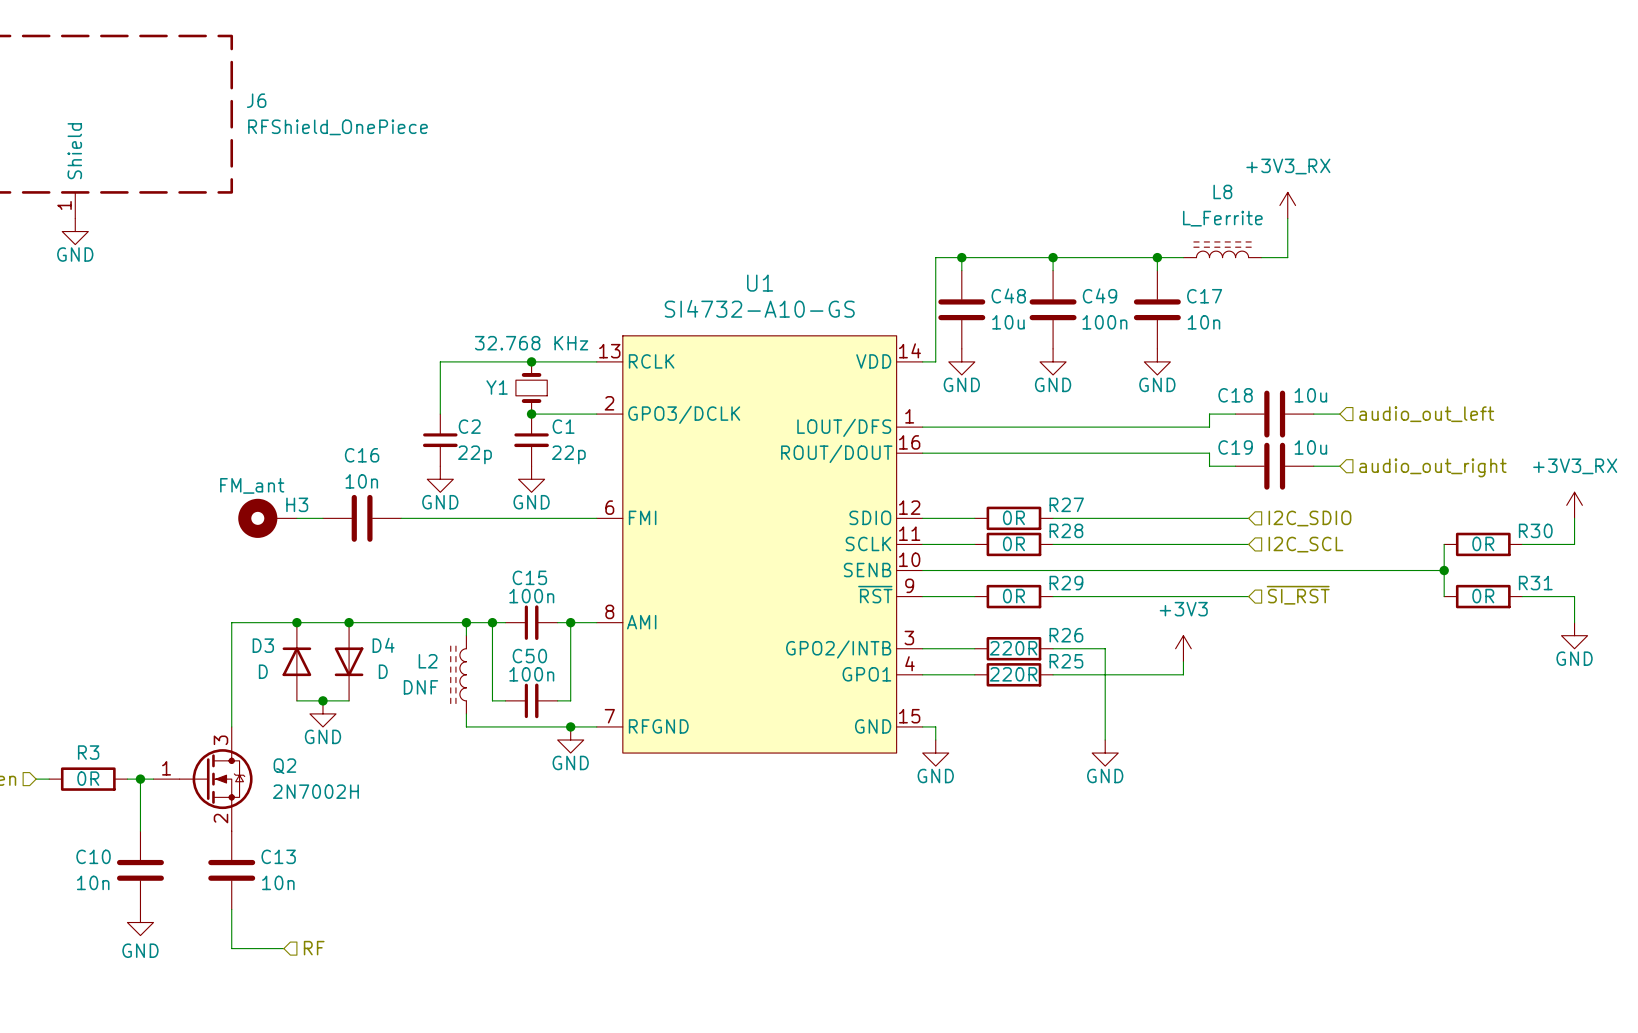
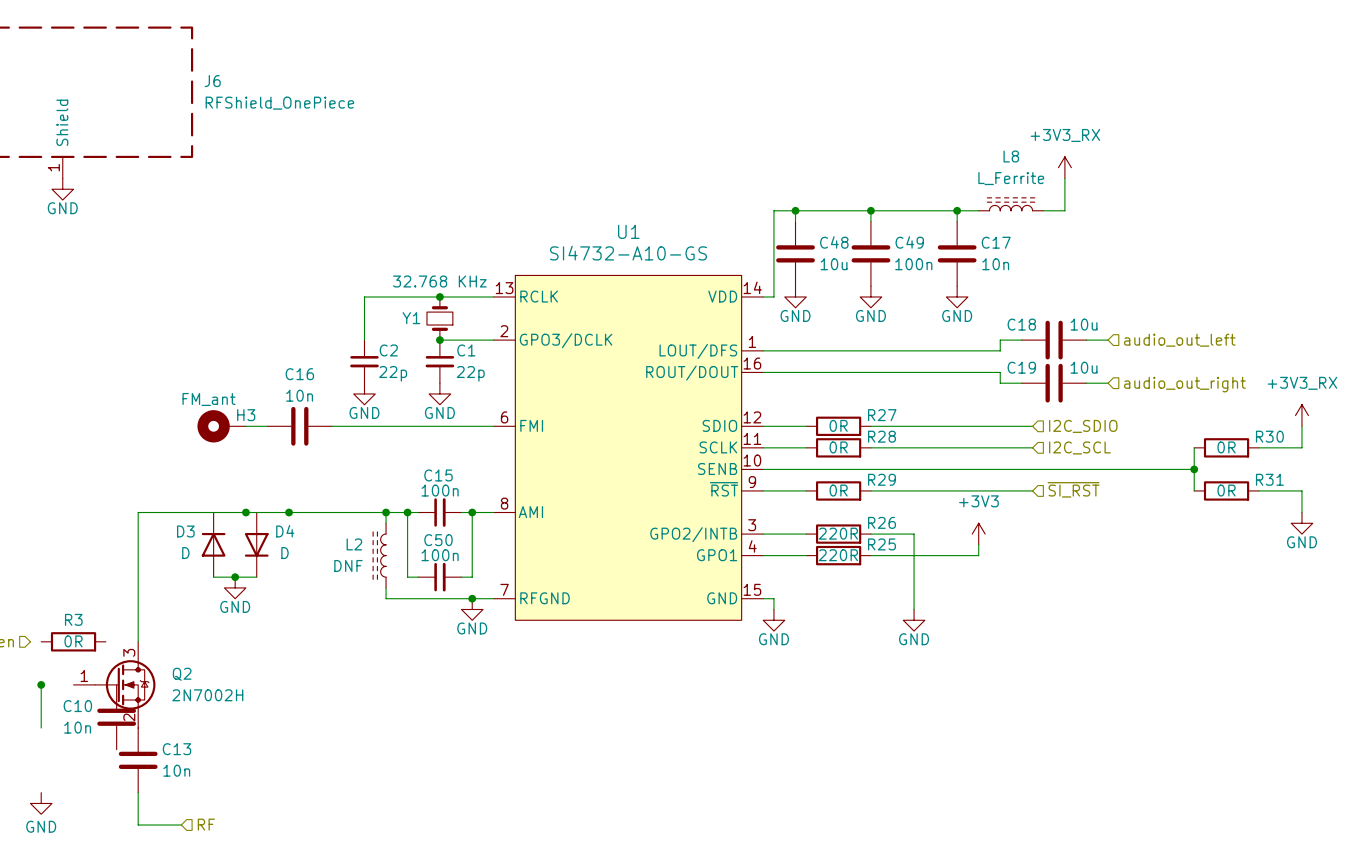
wire: (231, 622) (231, 726) -> (192, 512) (138, 512) (138, 641)
D3 position: (296, 661) -> (213, 544)
D4 position: (349, 661) -> (256, 544)
wire: (309, 700) (349, 700) -> (213, 577) (245, 577)
junction position: (322, 700) -> (235, 577)
power symbol position: GND (322, 713) -> GND (235, 587)
wire: (36, 779) (49, 779) -> none
wire: (127, 779) (153, 779) -> none
wire: (140, 779) (140, 831) -> (41, 684) (41, 728)
junction: (140, 779) -> none
Q2 position: (203, 779) -> (114, 684)
junction: none -> (41, 684)
C13 position: (231, 870) -> (138, 760)
wire: (231, 909) (231, 948) (283, 948) -> (138, 792) (138, 825) (181, 825)
power symbol position: GND (140, 922) -> GND (41, 803)
hierarchical label position: RF (314, 948) -> RF (206, 824)

